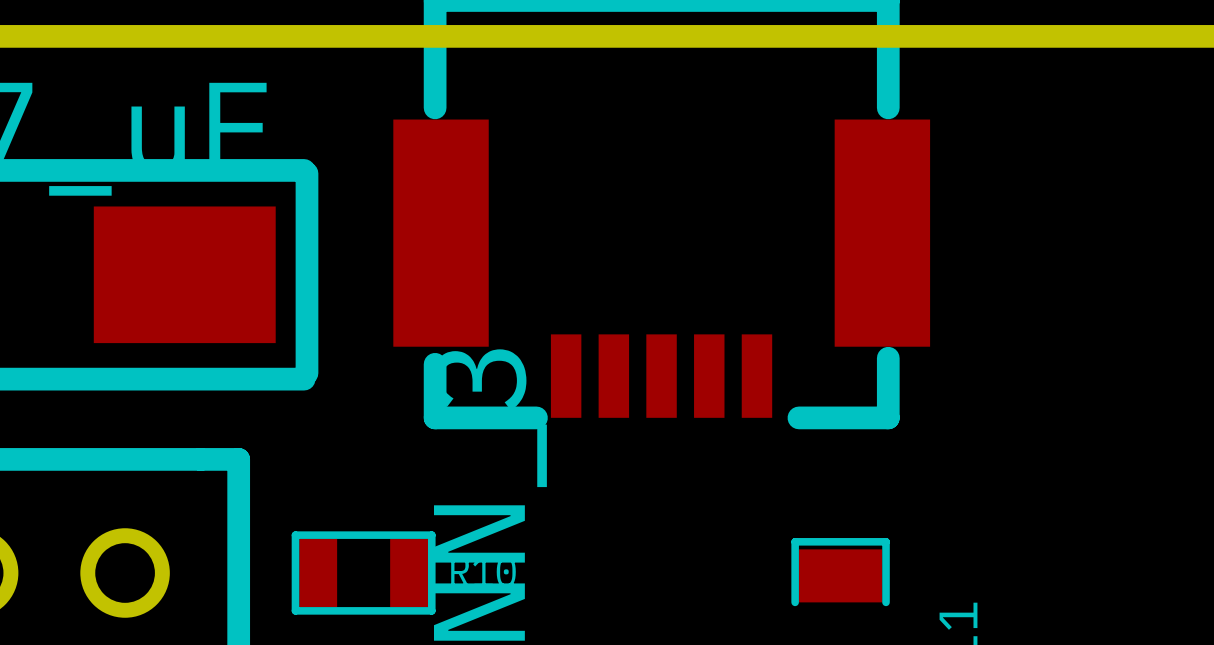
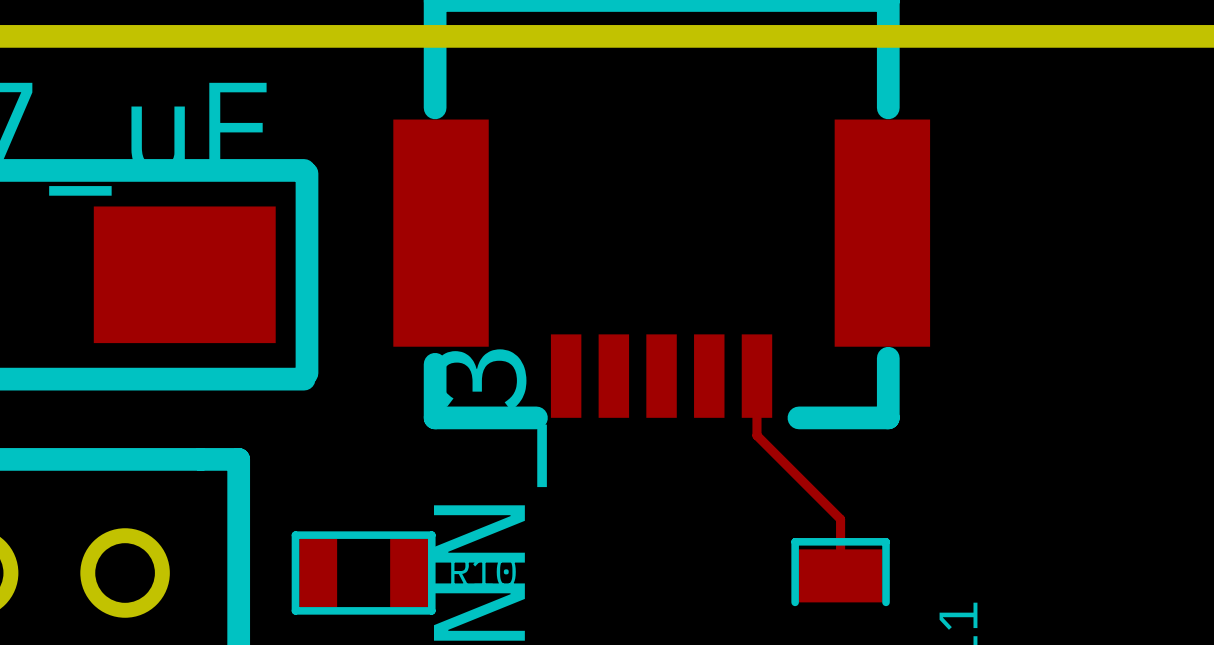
track: none -> (756, 376) (756, 435) (840, 519) (840, 575)

